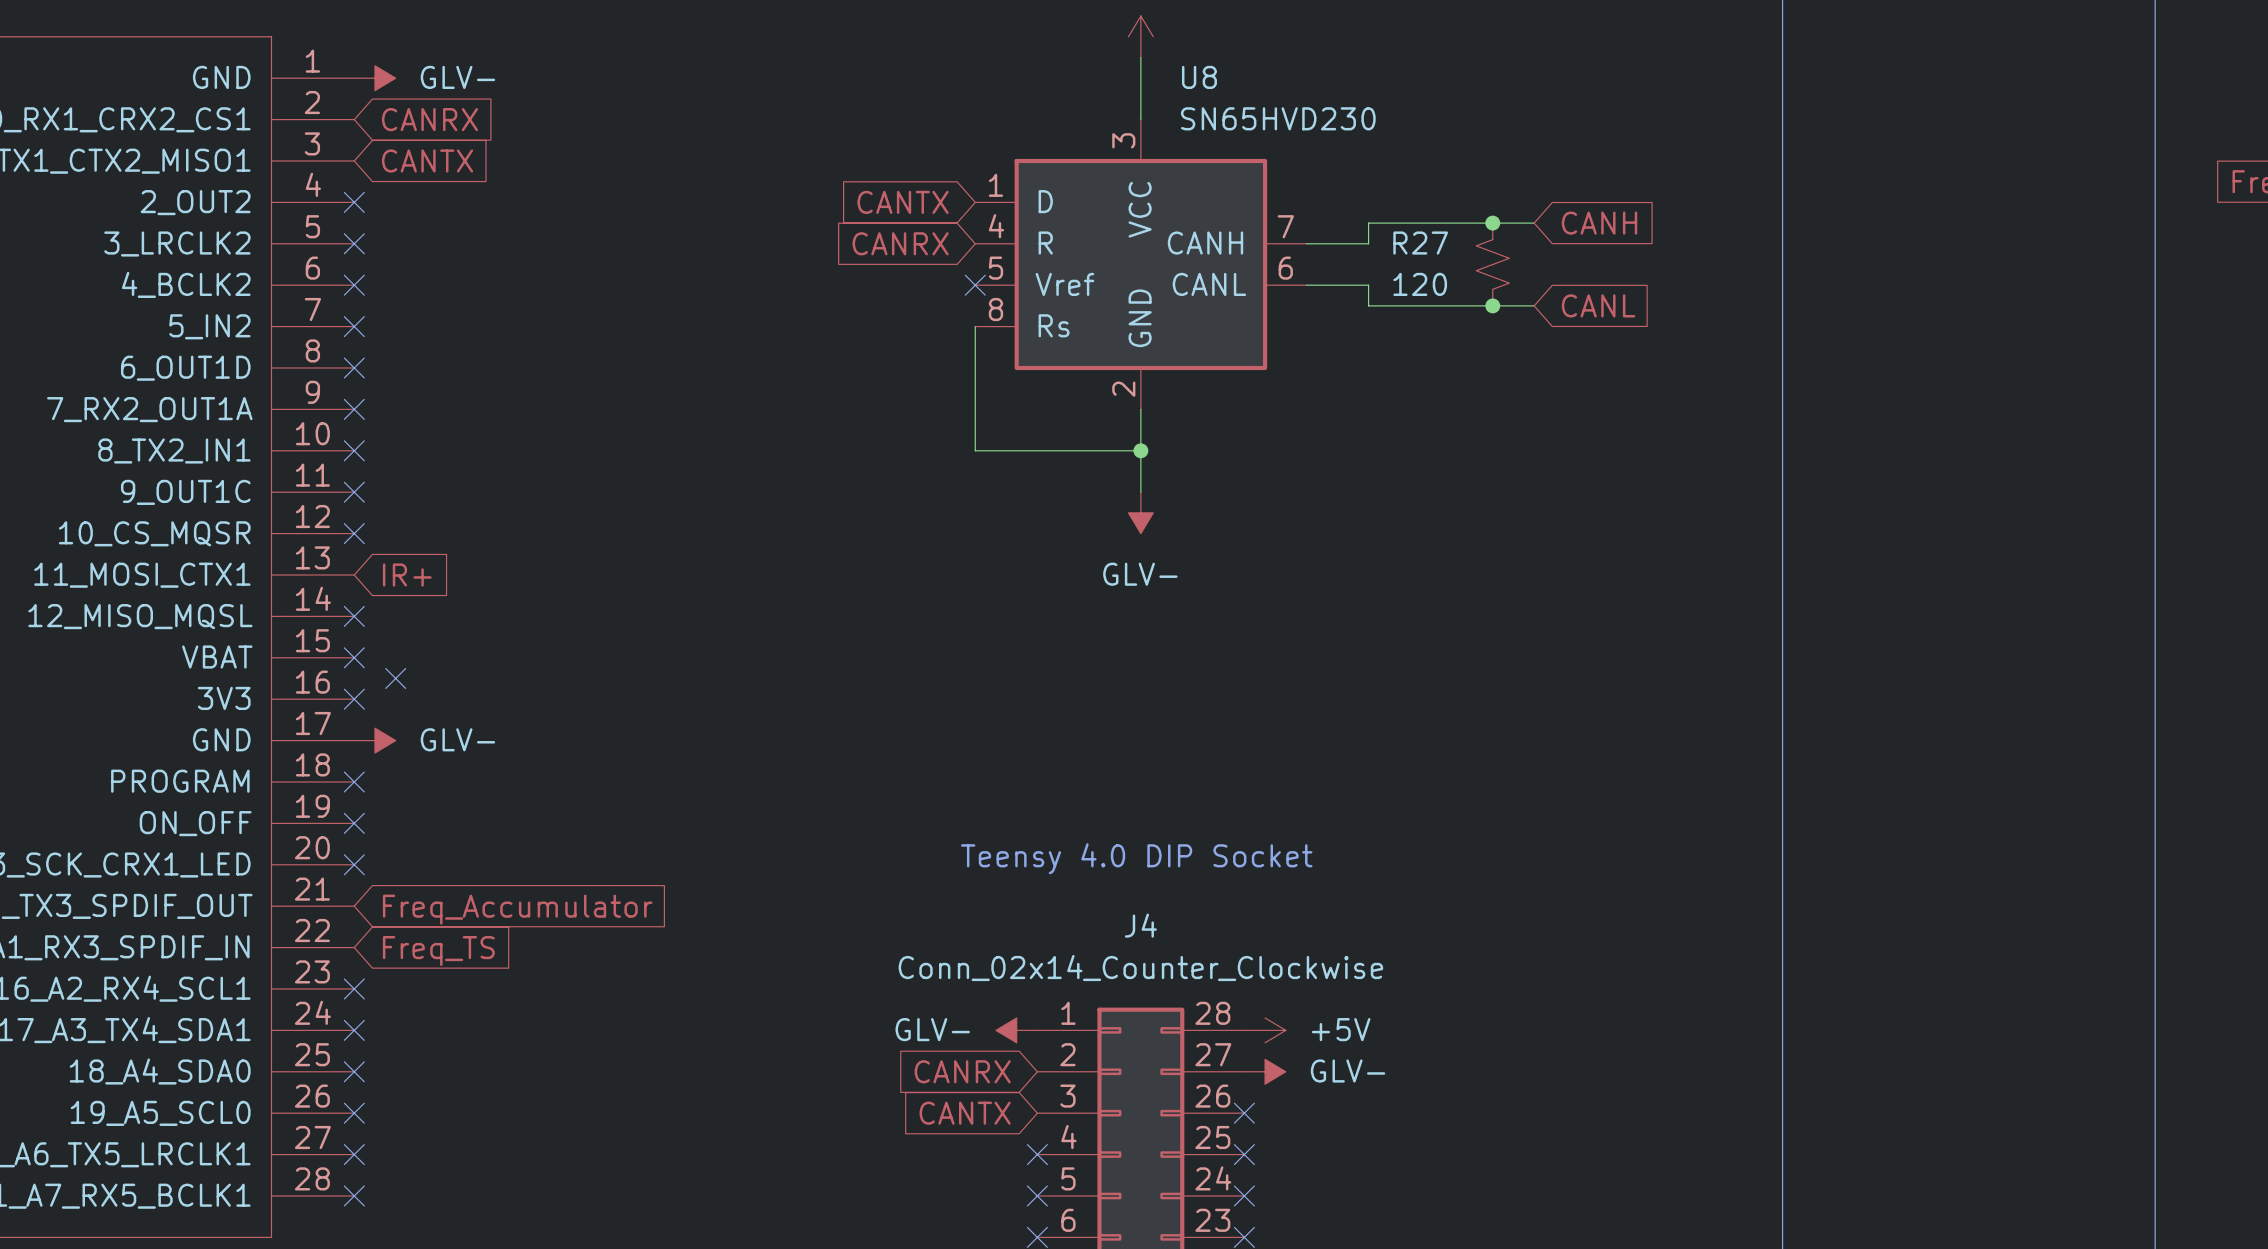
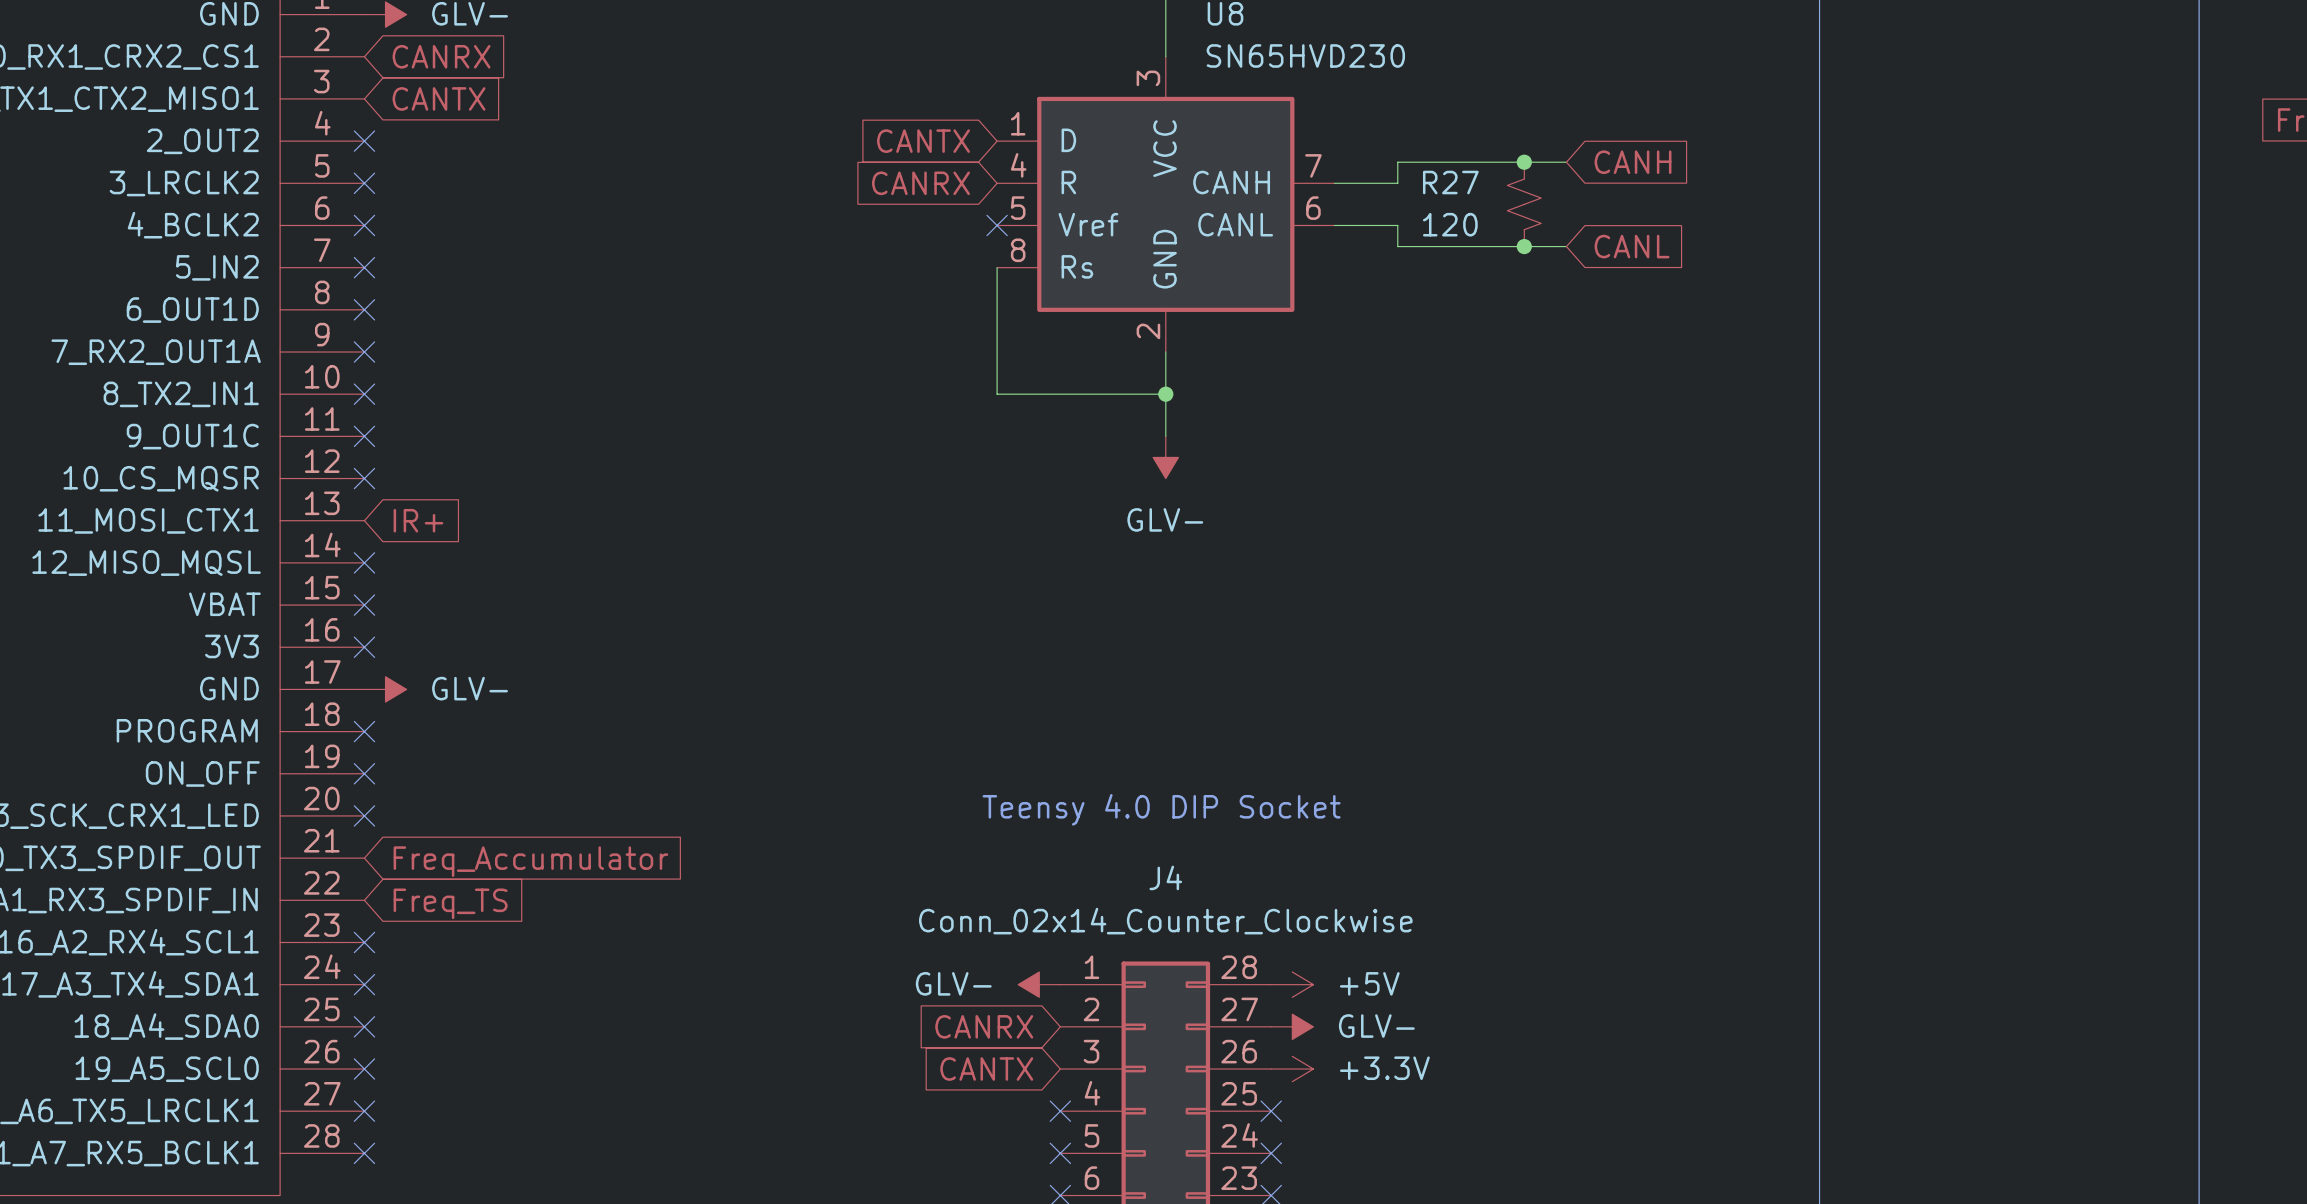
no-connect mark: (395, 678) -> none
no-connect mark: (1244, 1113) -> none
power symbol: none -> +3.3V (1292, 1069)

